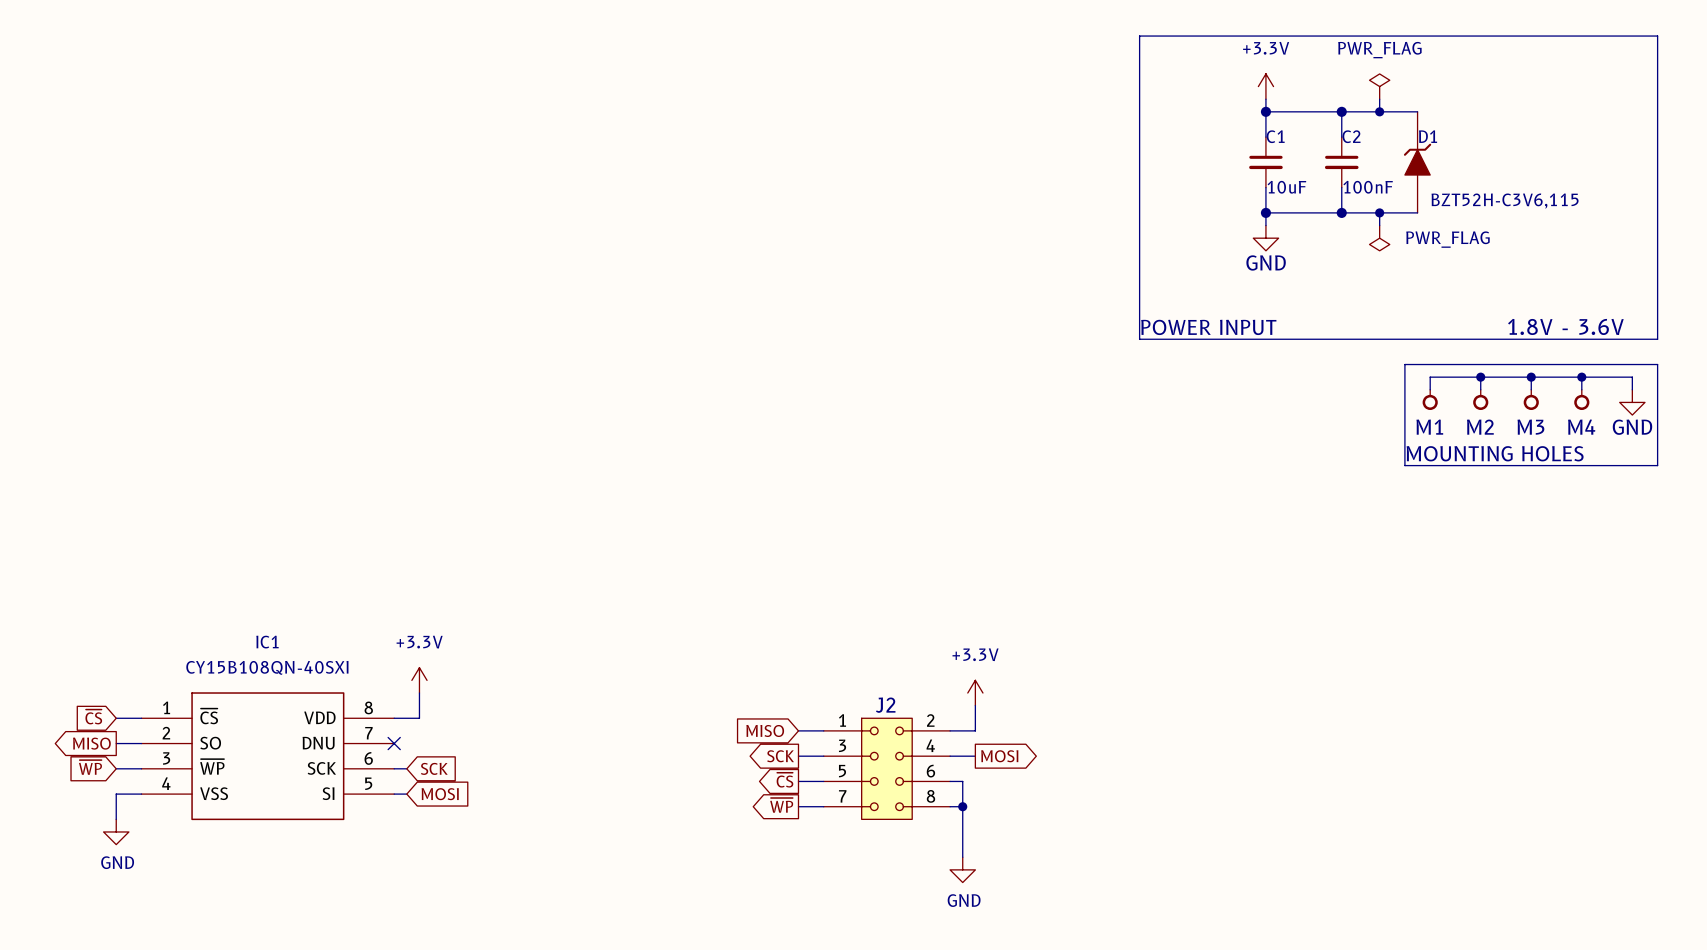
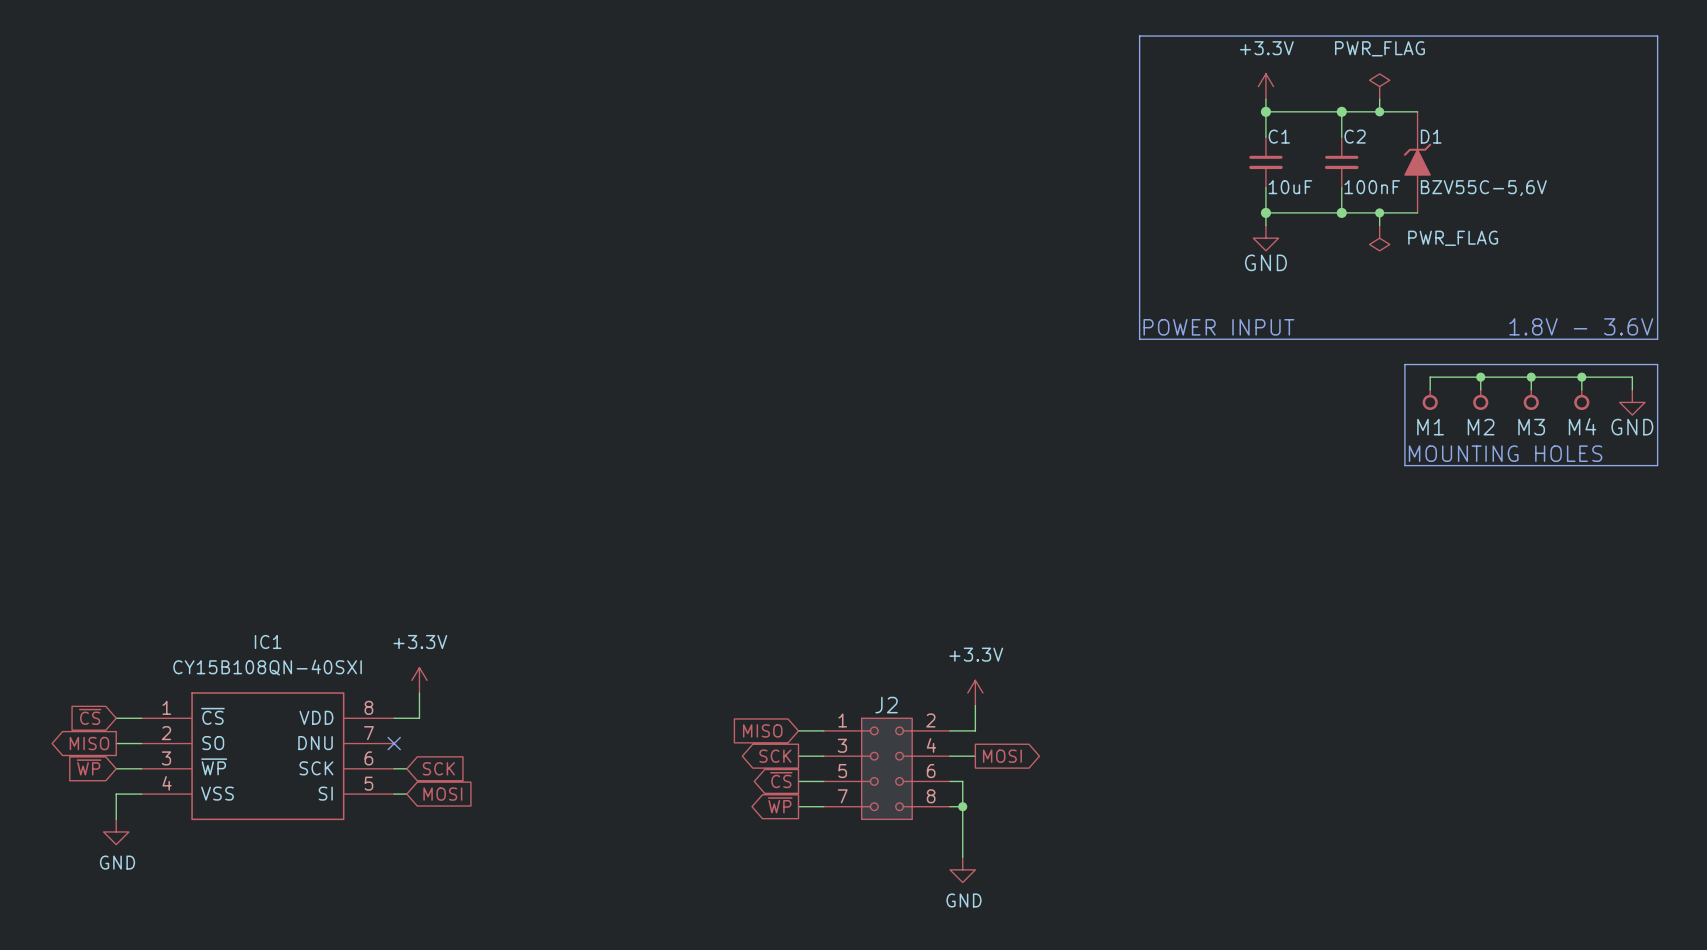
D1 value: BZT52H-C3V6,115 (1505, 201) -> BZV55C-5,6V (1483, 188)

